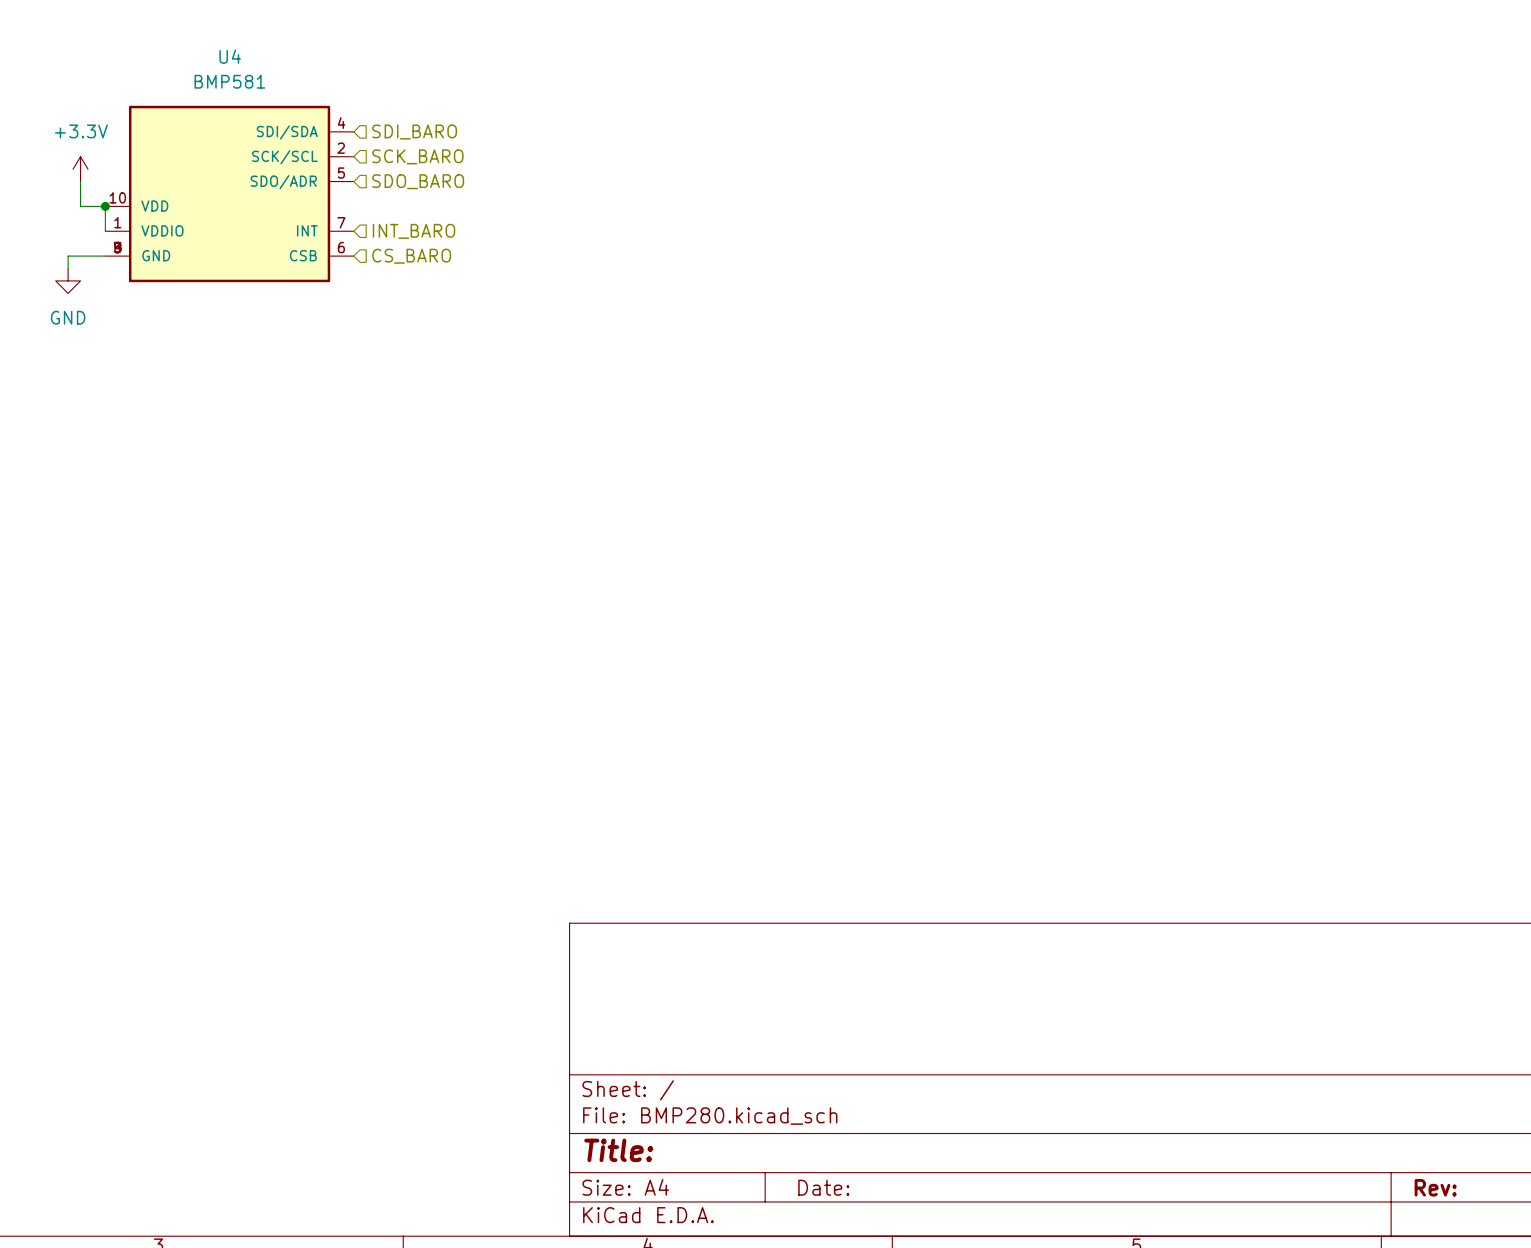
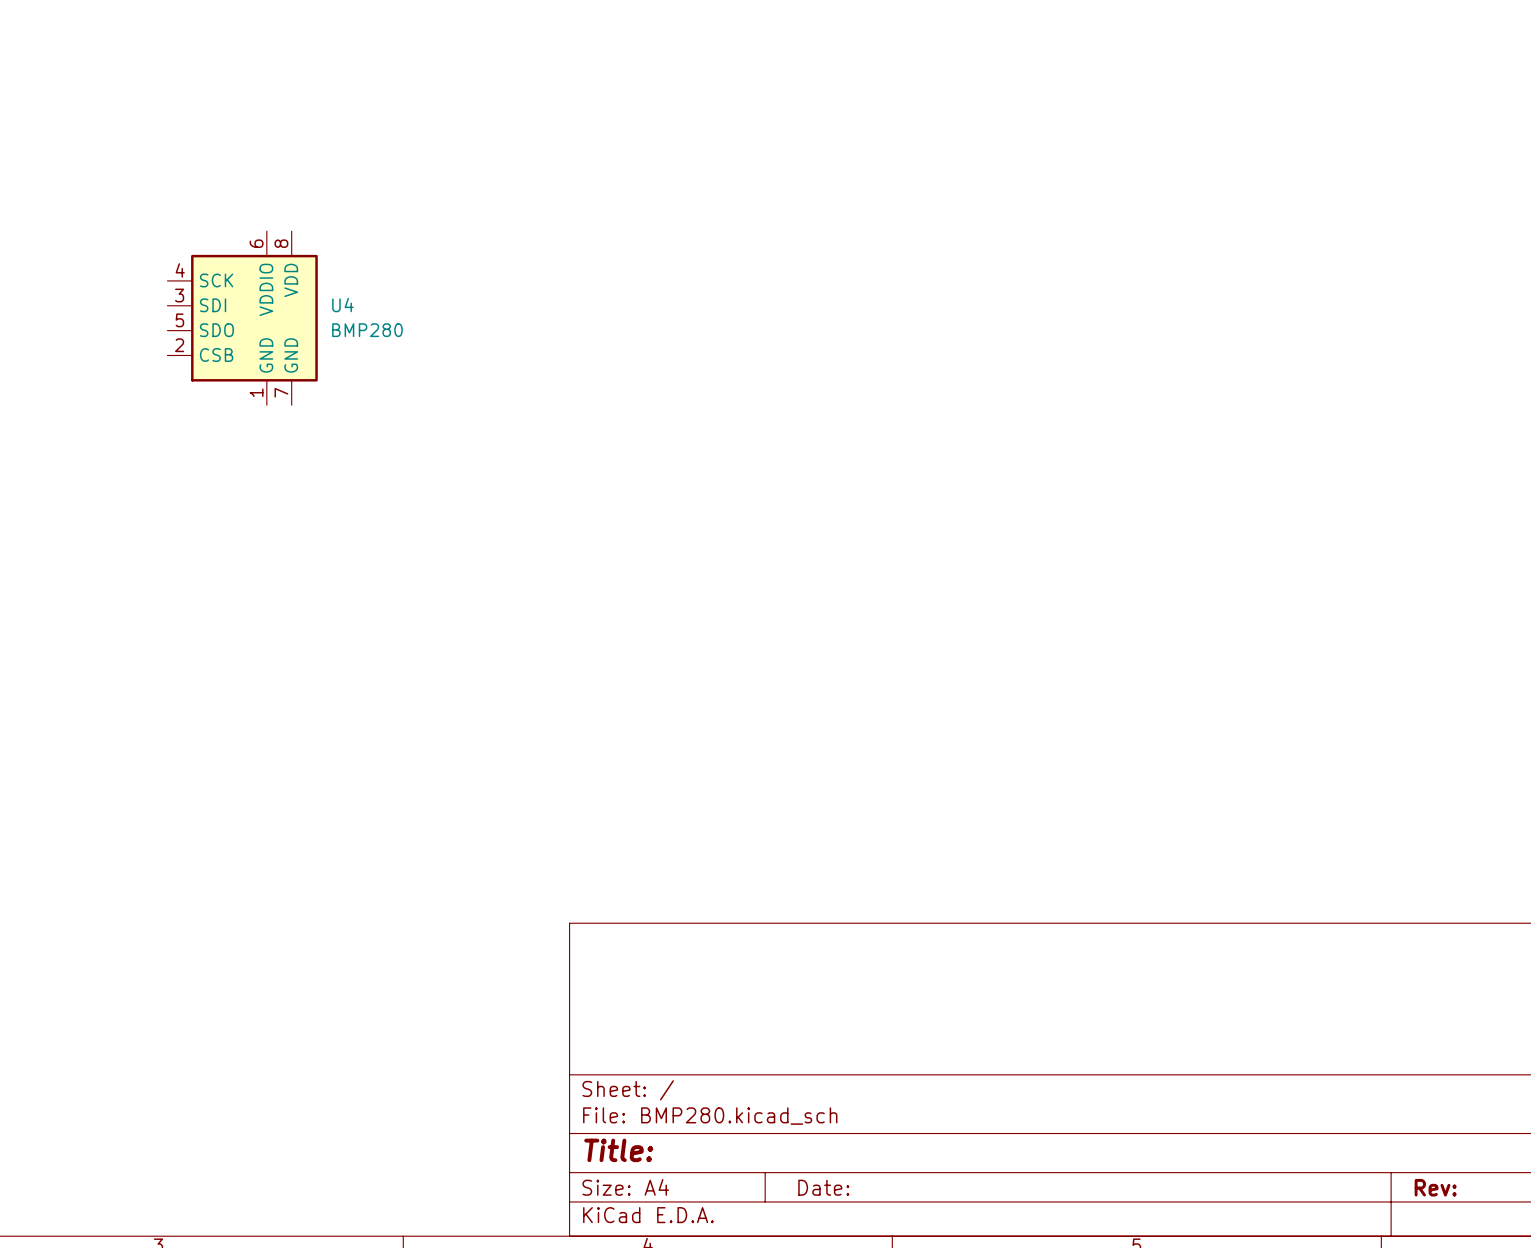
U4 name position: U4 (230, 56) -> U4 (342, 305)
U4 value: BMP581 (229, 81) -> BMP280 (367, 330)
U4 symbol: [105, 105, 354, 283] -> [167, 231, 318, 406]
hierarchical label: SDI_BARO (414, 132) -> none
hierarchical label: SCK_BARO (417, 156) -> none
power symbol: +3.3V (80, 169) -> none
wire: (80, 181) (80, 206) (105, 206) (105, 231) -> none
hierarchical label: SDO_BARO (418, 181) -> none
junction: (105, 206) -> none
hierarchical label: INT_BARO (414, 231) -> none
wire: (105, 256) (68, 256) (68, 268) -> none
hierarchical label: CS_BARO (411, 256) -> none
power symbol: GND (68, 280) -> none

